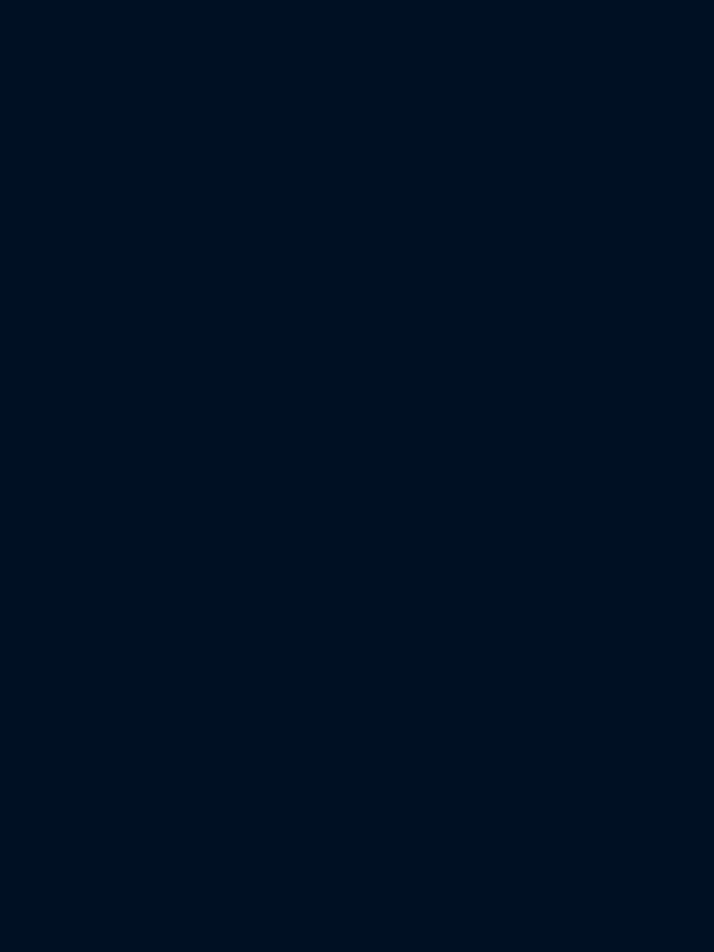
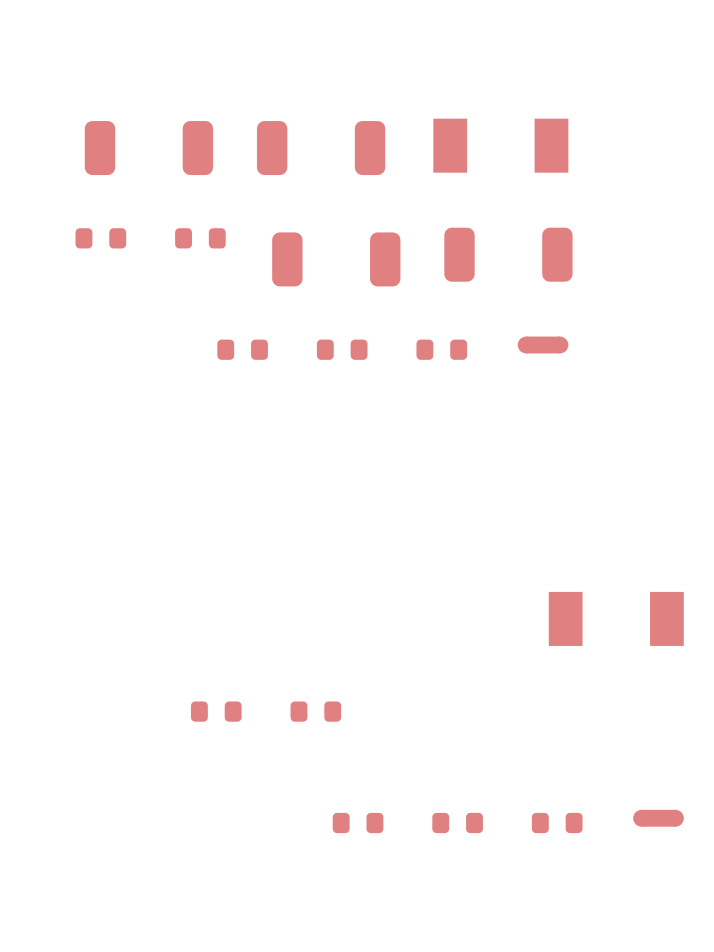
part: none -> (500, 145)
part: none -> (148, 148)
part: none -> (321, 148)
part: none -> (100, 238)
part: none -> (200, 238)
part: none -> (508, 254)
part: none -> (336, 259)
part: none -> (543, 345)
part: none -> (242, 349)
part: none -> (342, 349)
part: none -> (441, 349)
part: none -> (616, 618)
part: none -> (216, 711)
part: none -> (315, 711)
part: none -> (658, 818)
part: none -> (358, 822)
part: none -> (457, 822)
part: none -> (557, 822)

